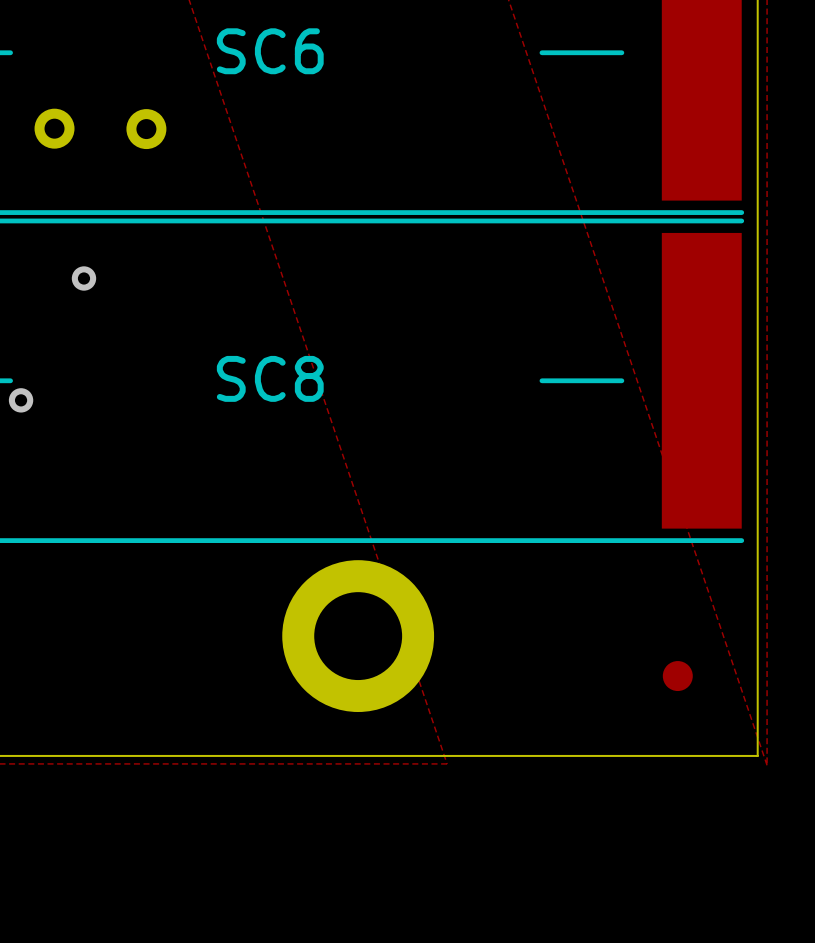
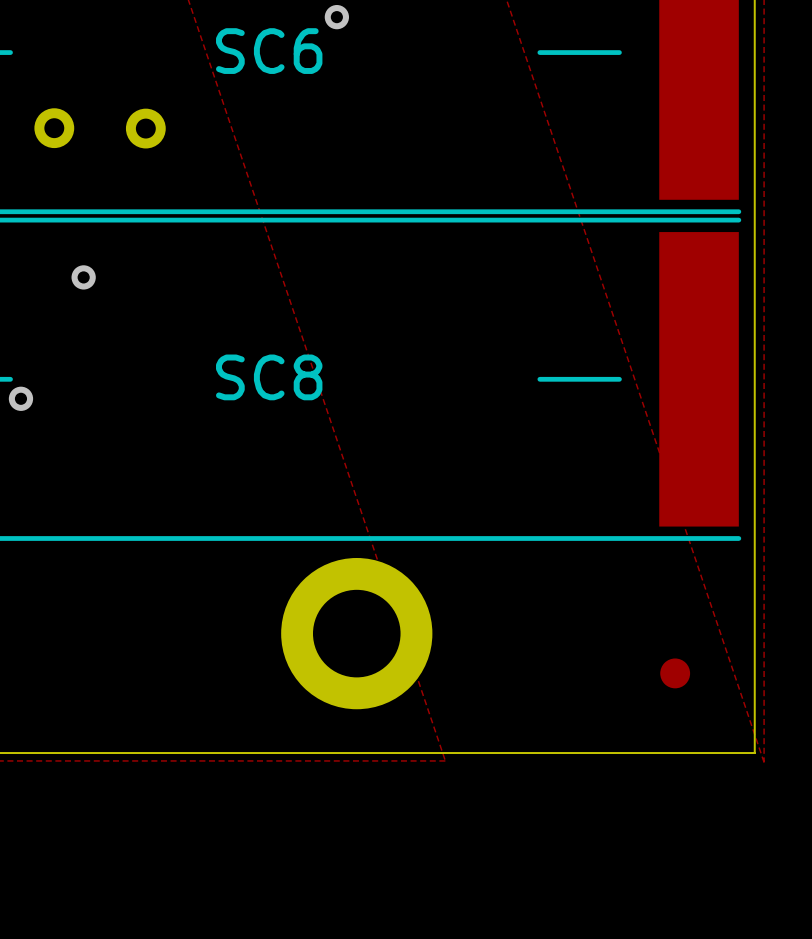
via: none -> (336, 17)

